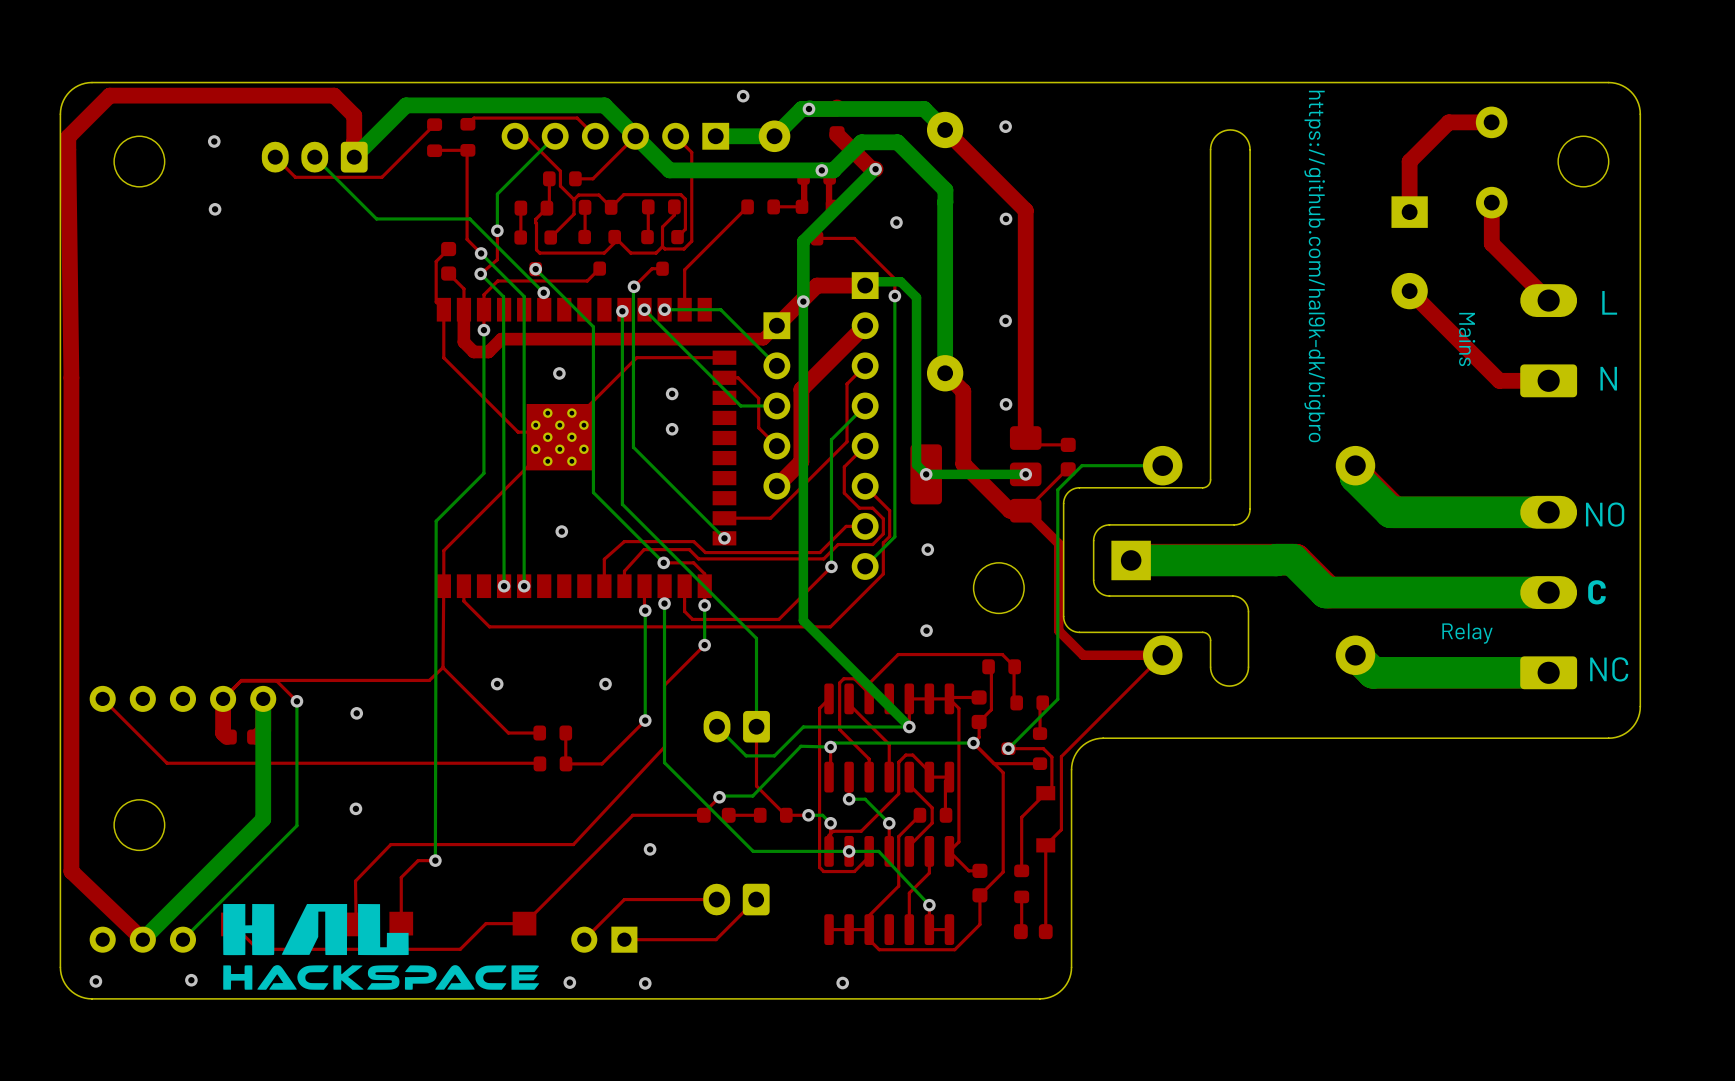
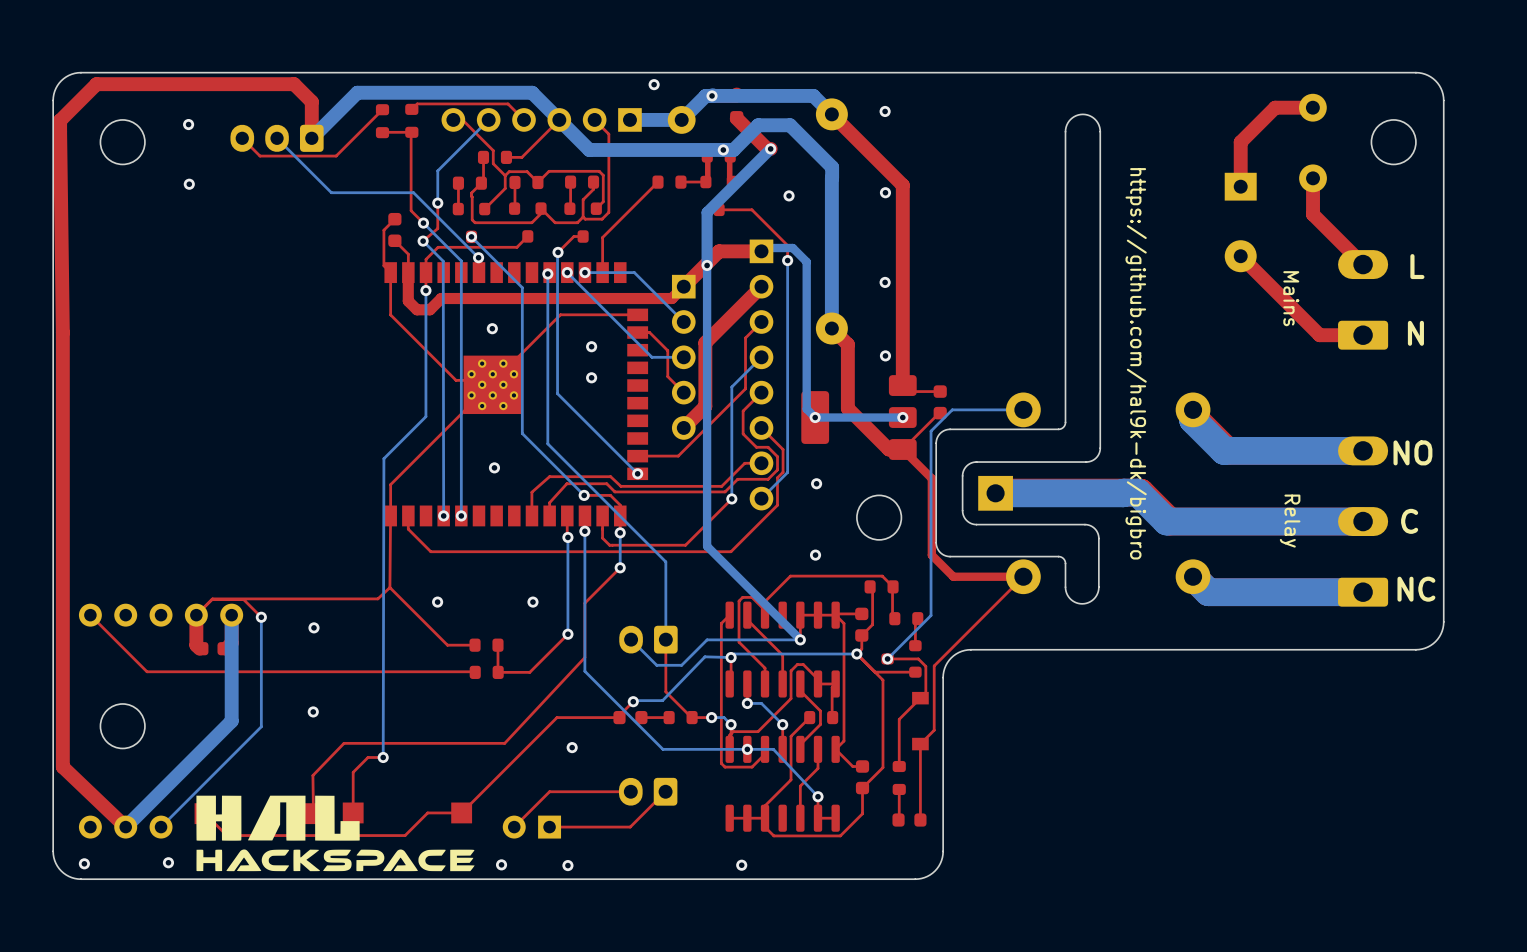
text position: https://github.com/hal9k-dk/bigbro (1314, 266) -> https://github.com/hal9k-dk/bigbro (1136, 363)
part value rotation: 0° (1467, 633) -> 90° clockwise (1290, 521)

